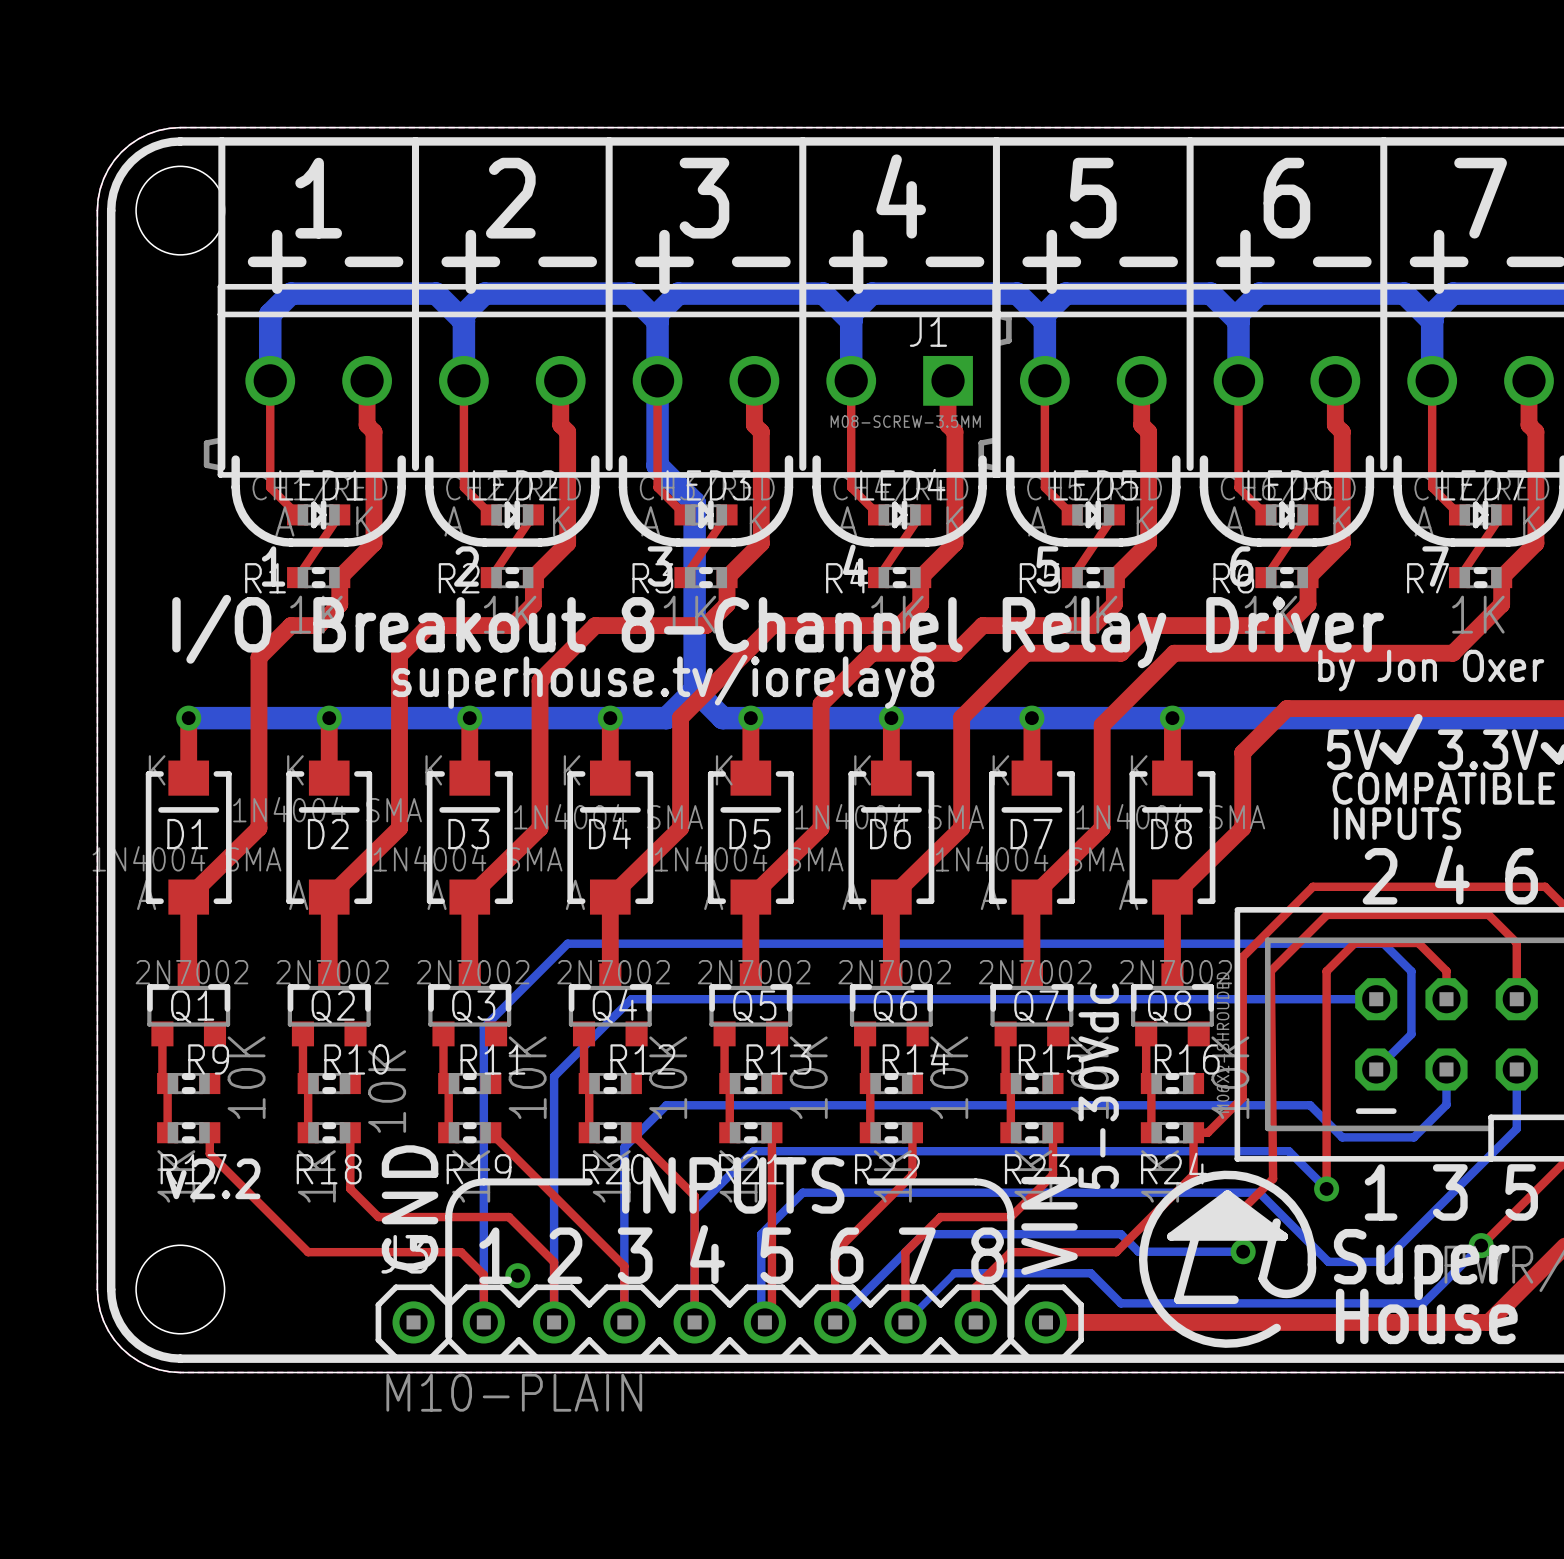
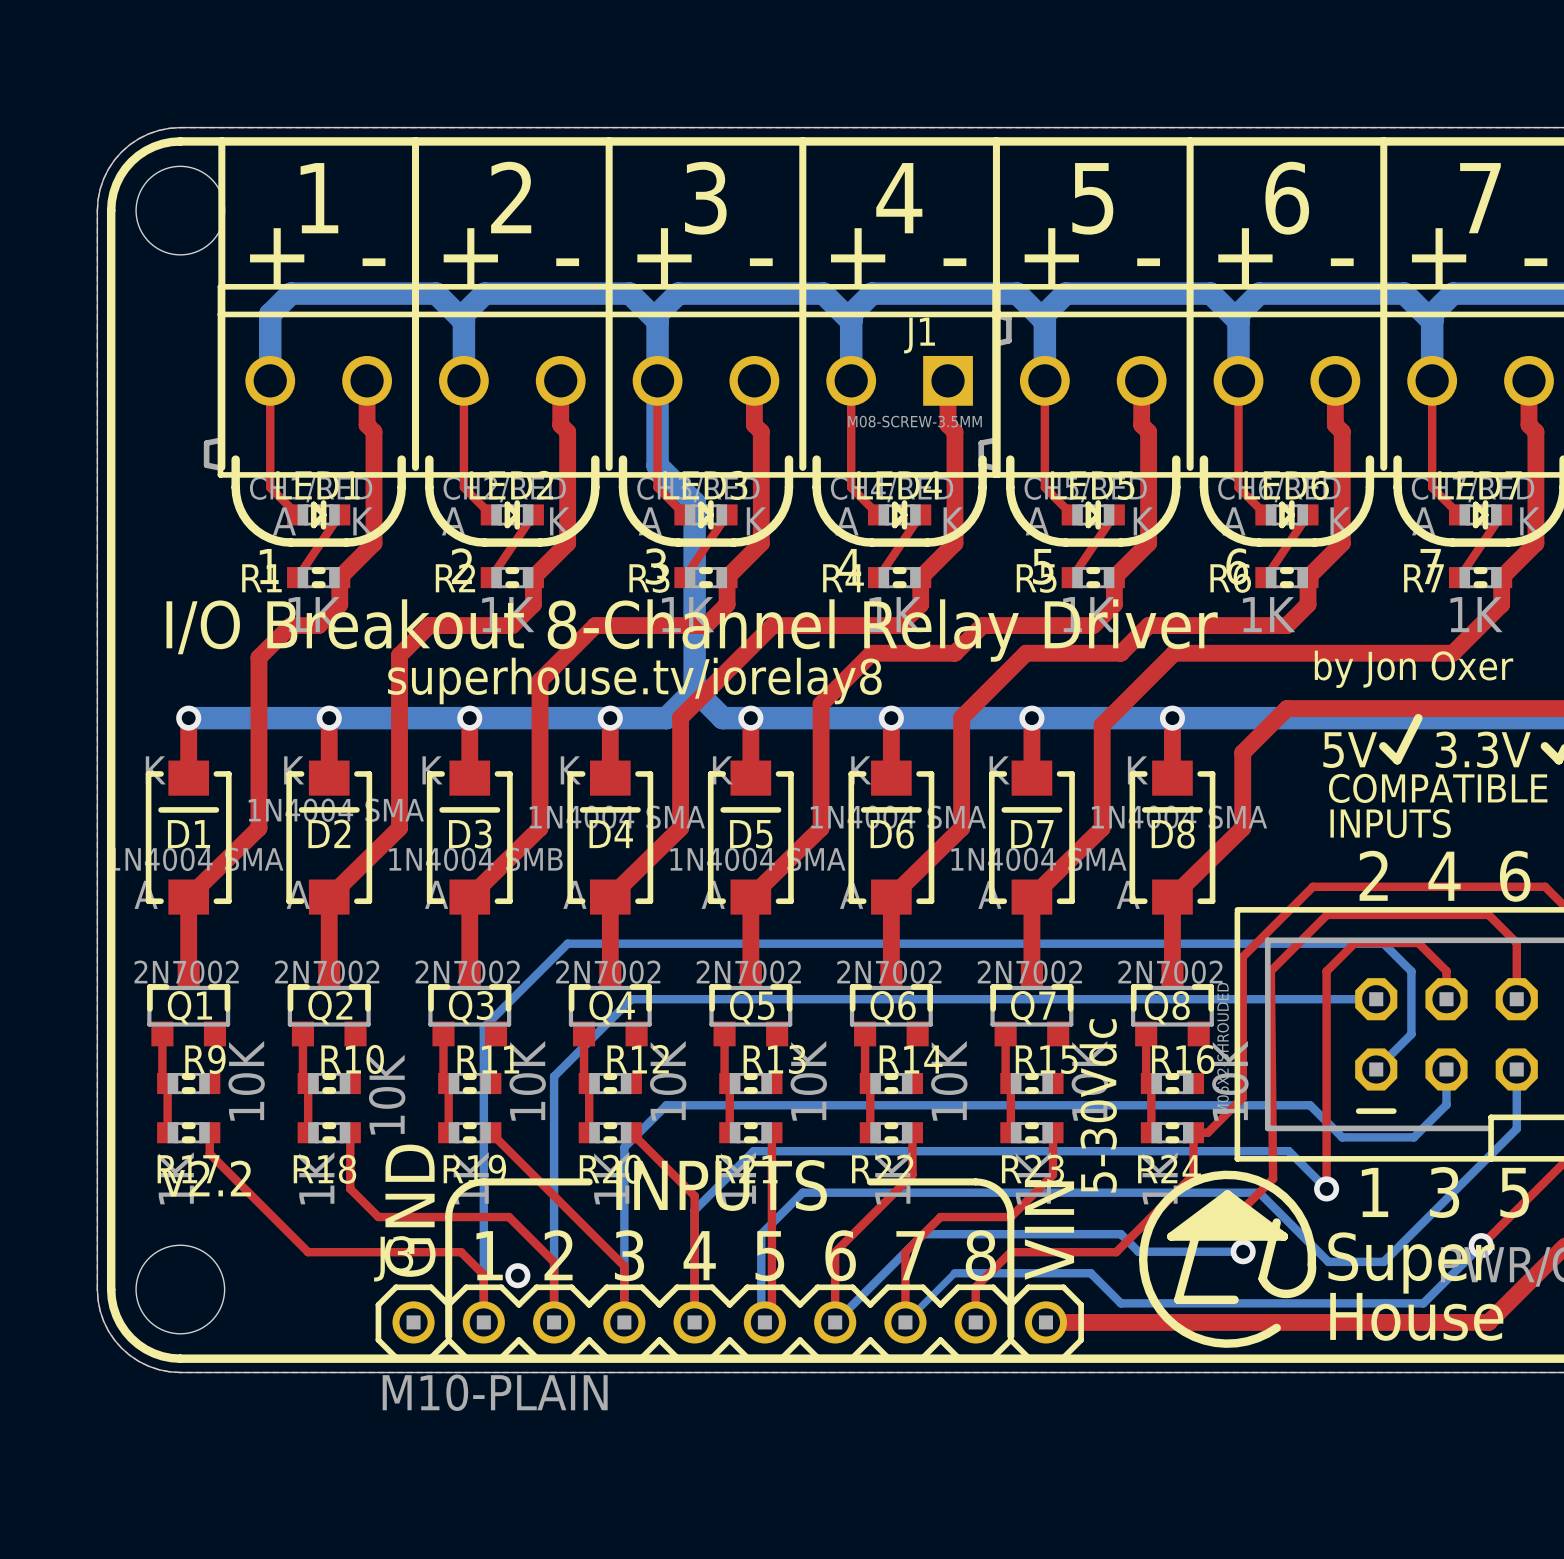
D3 value: 1N4004 SMA (468, 858) -> 1N4004 SMB (475, 859)

